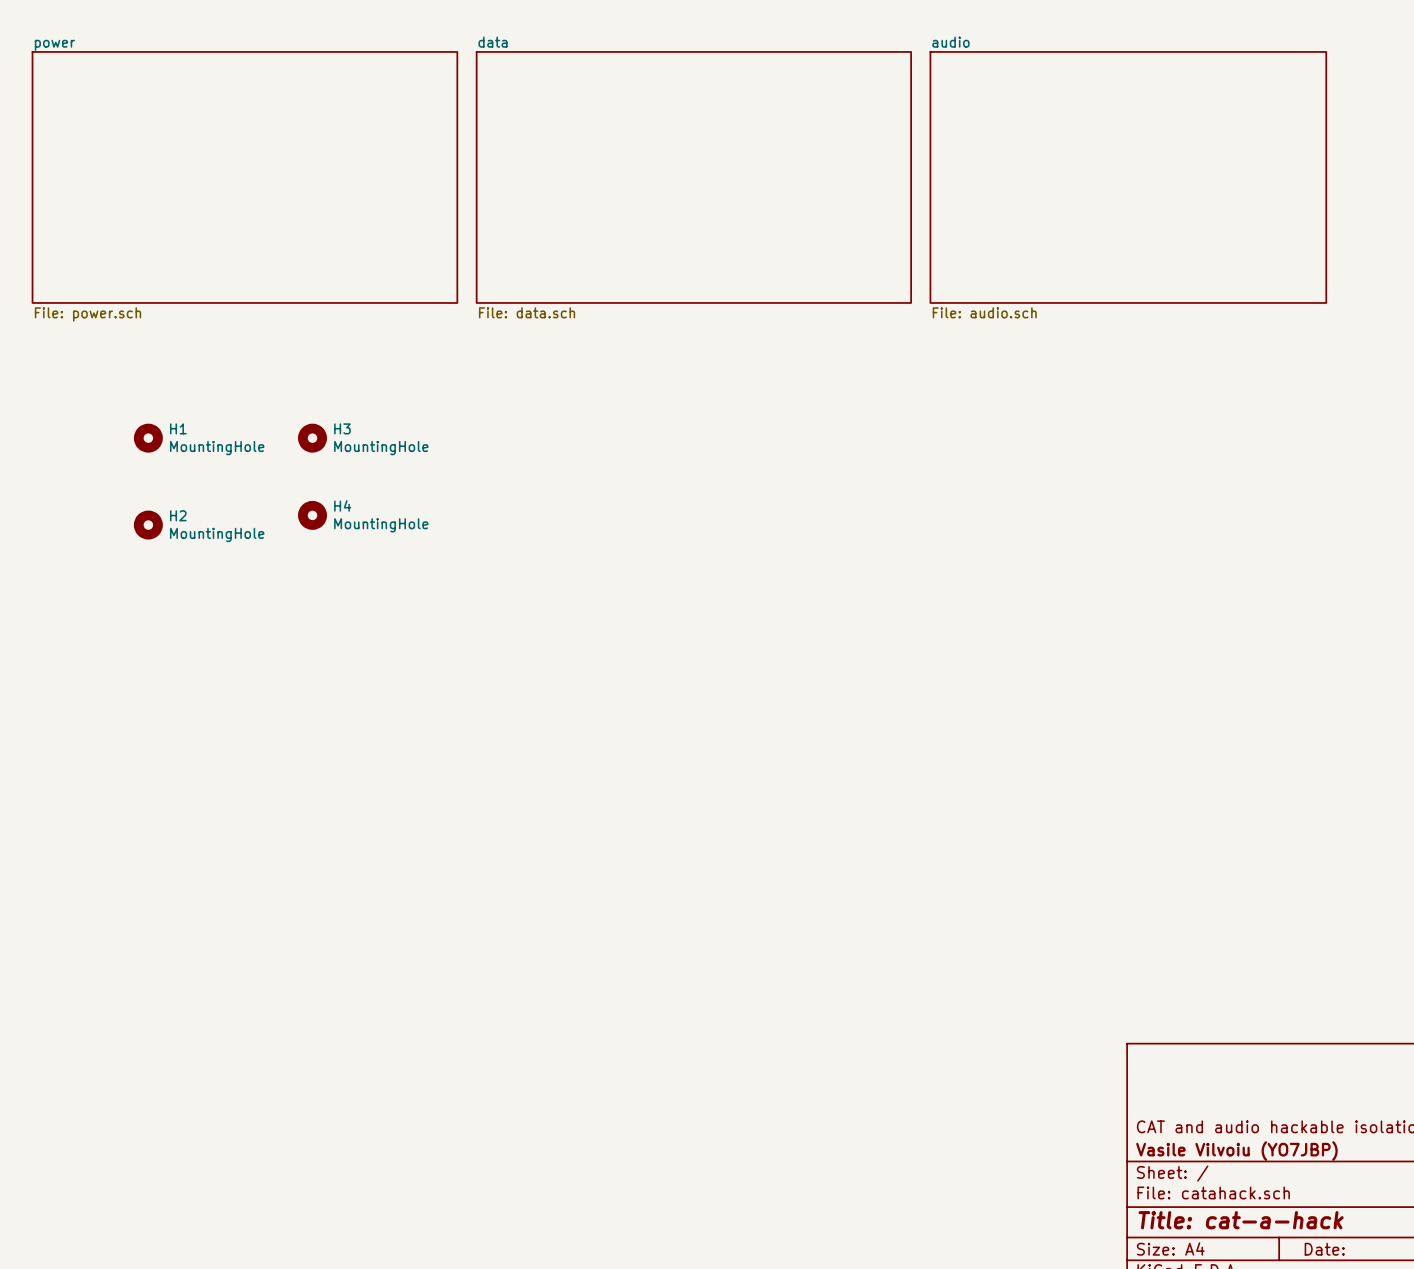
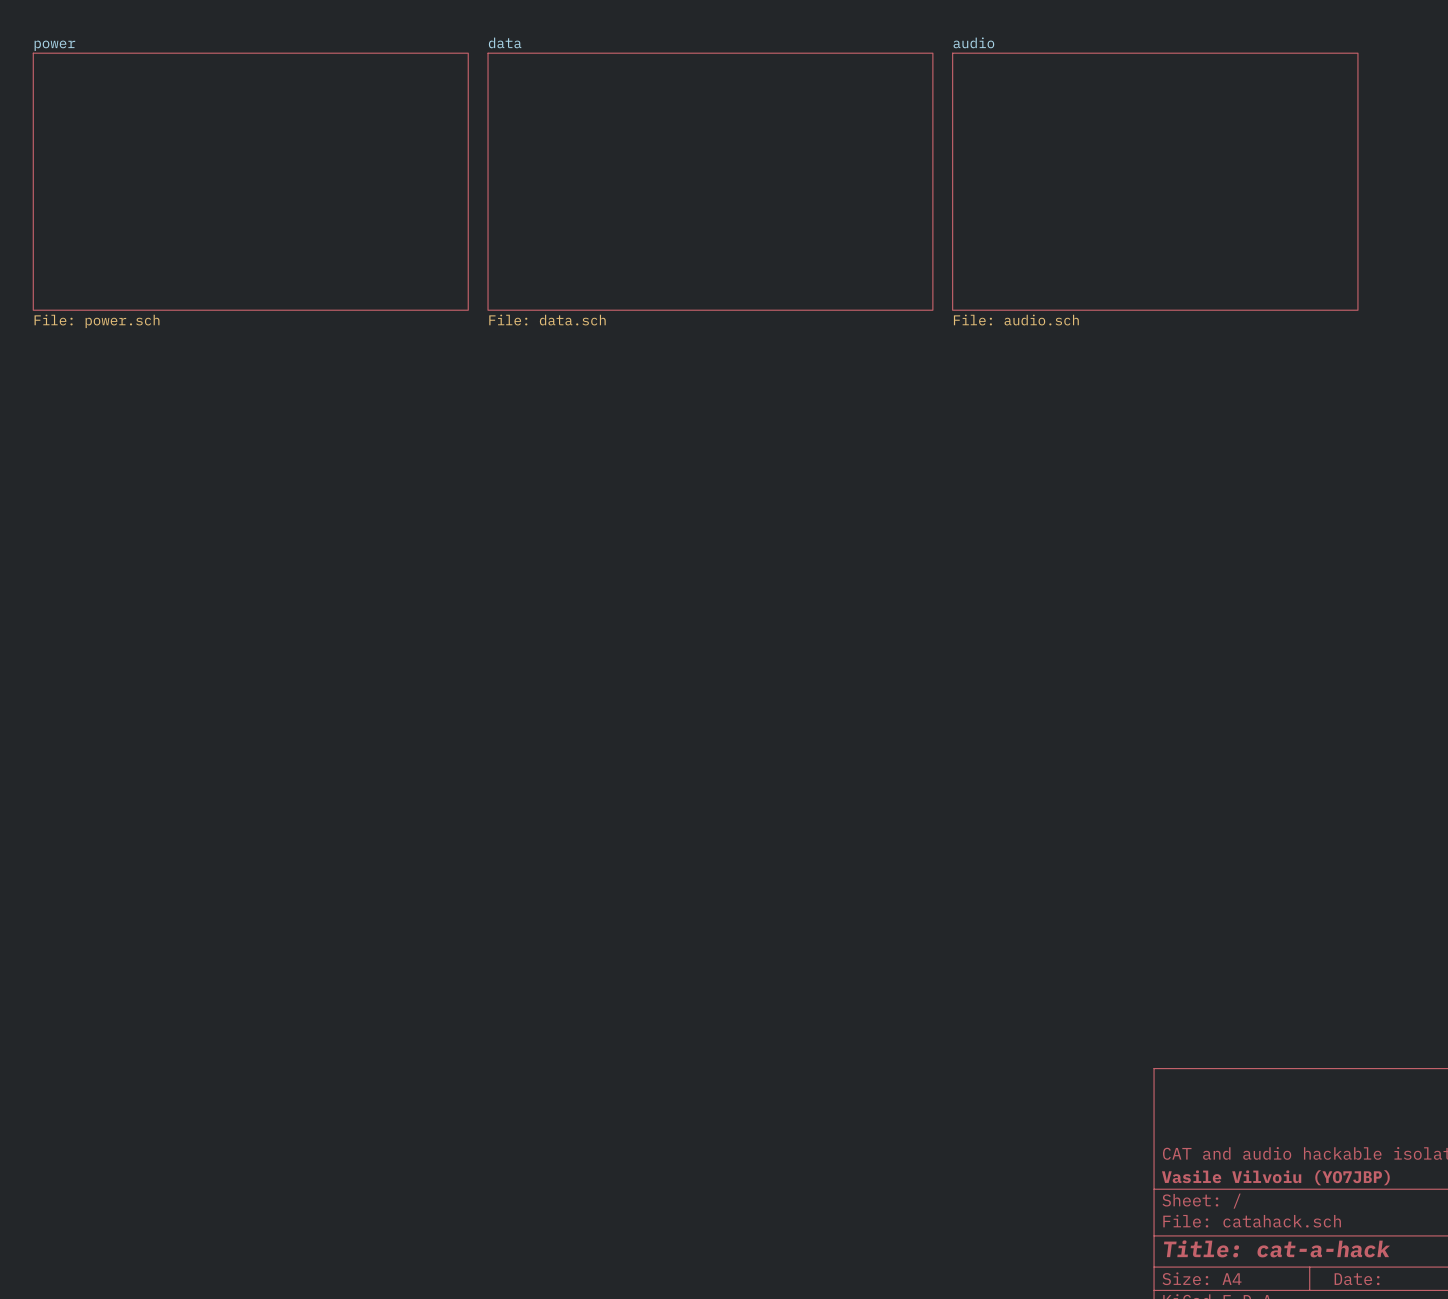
H1: MountingHole (148, 438) -> none
H3: MountingHole (312, 438) -> none
H4: MountingHole (312, 515) -> none
H2: MountingHole (148, 525) -> none

